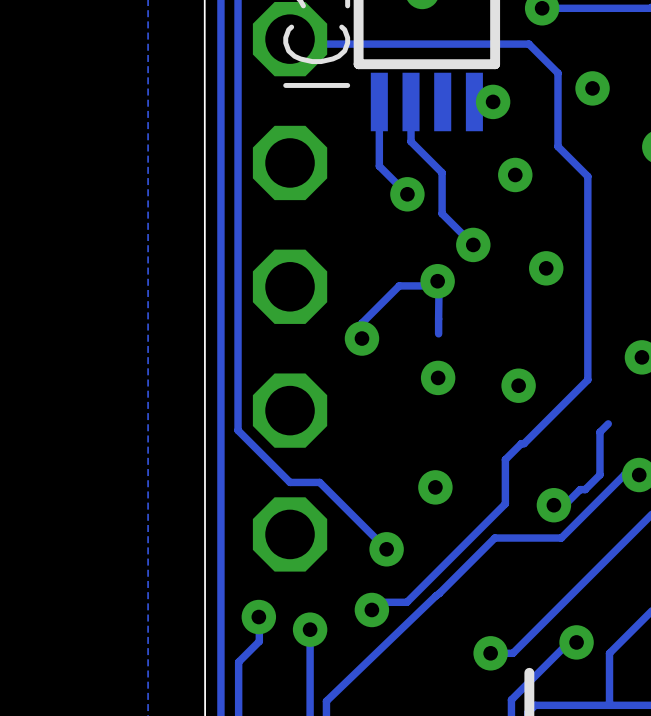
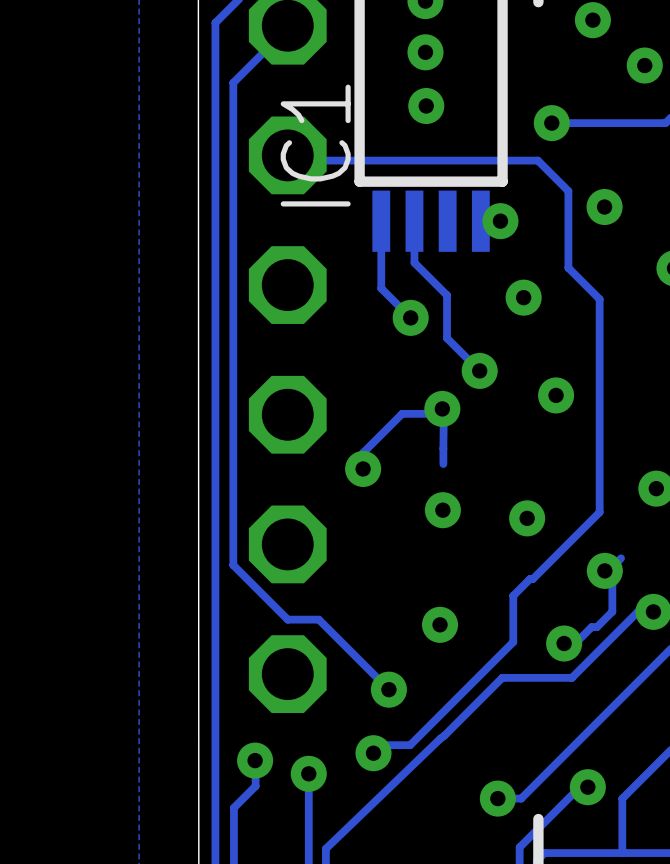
via: none -> (604, 570)

